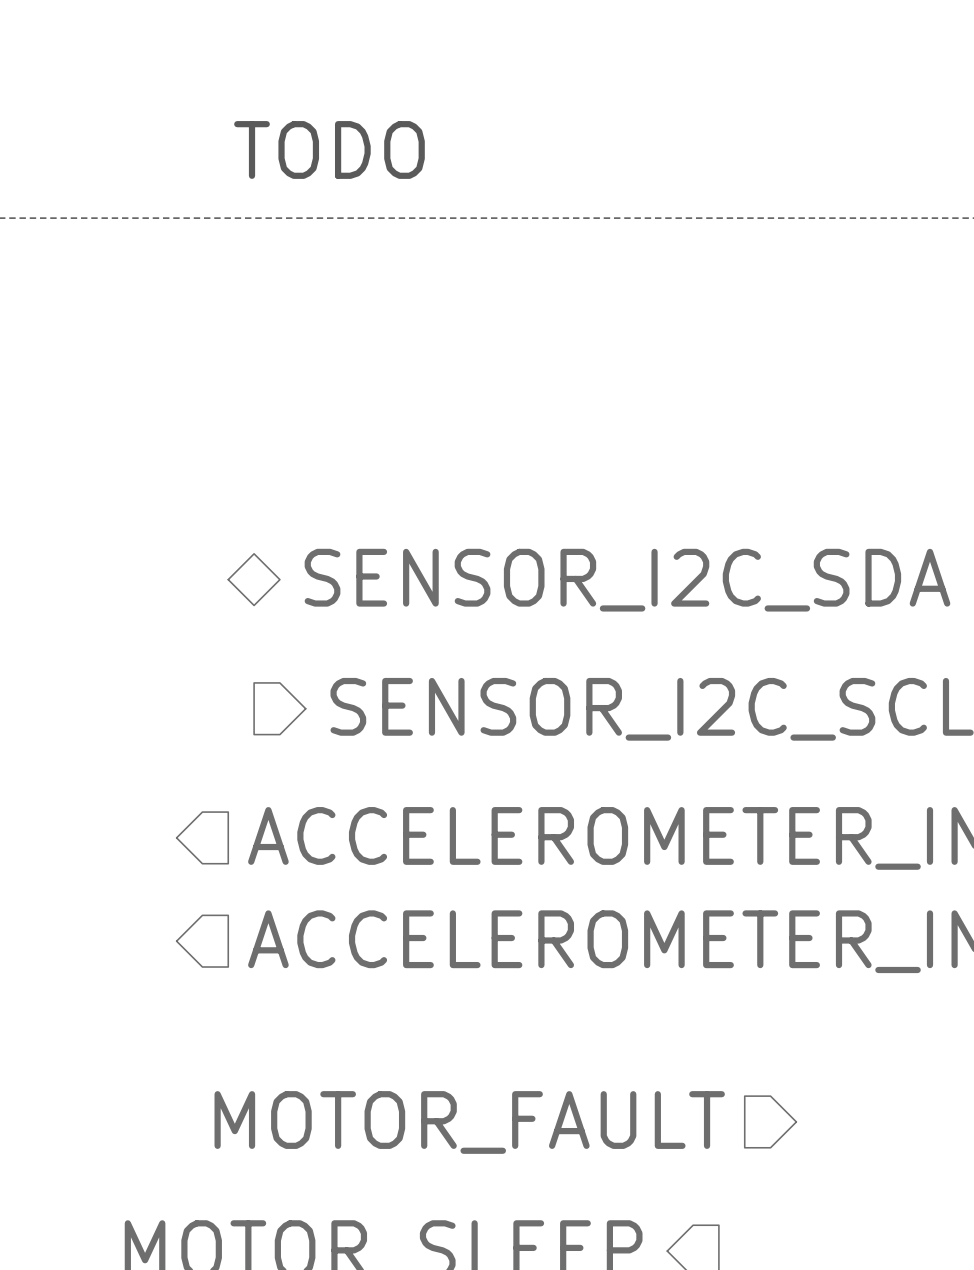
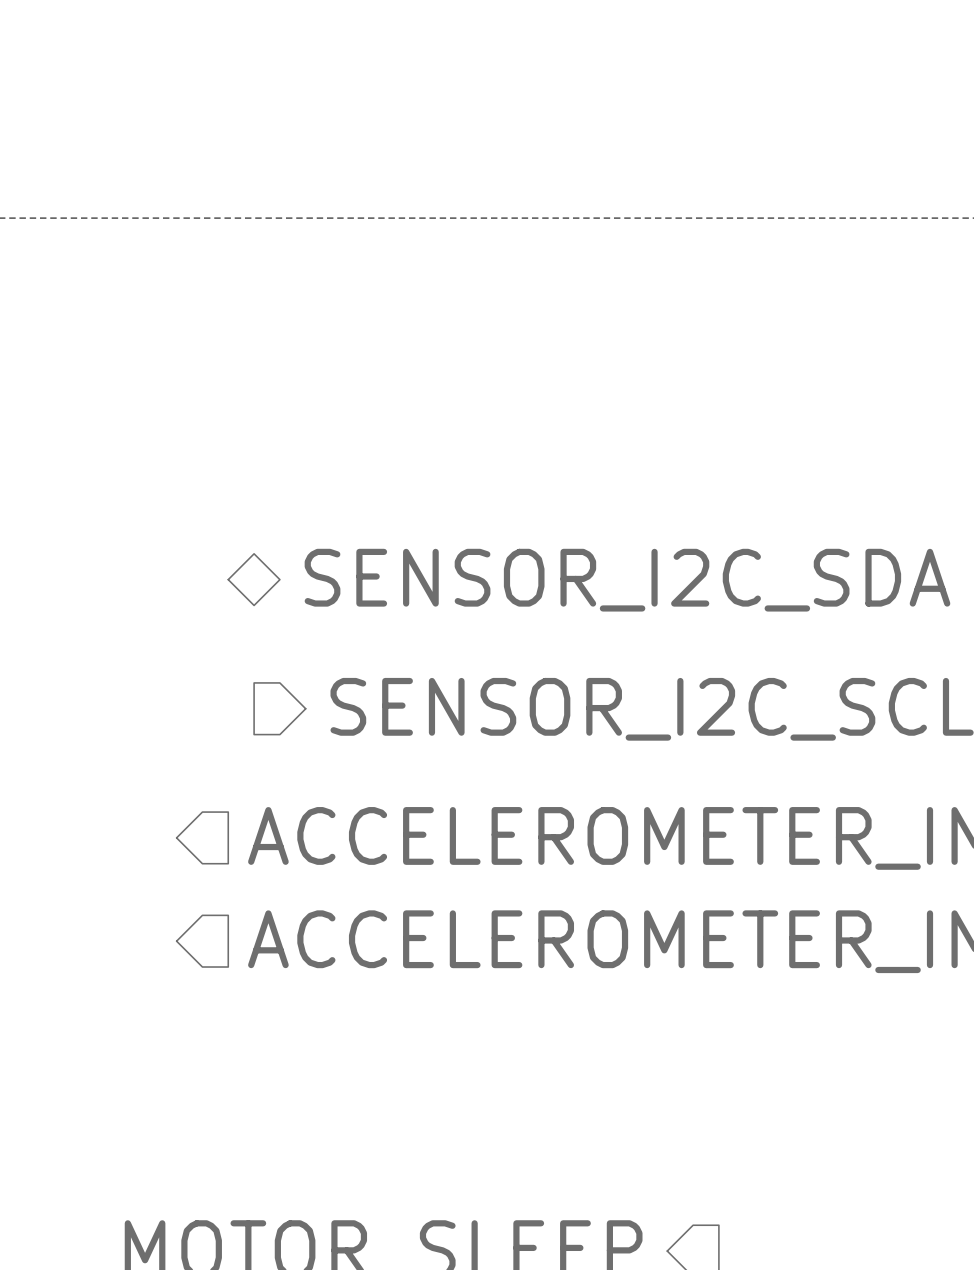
text: TODO (329, 149) -> none
hierarchical label: MOTOR_FAULT (469, 1122) -> none

